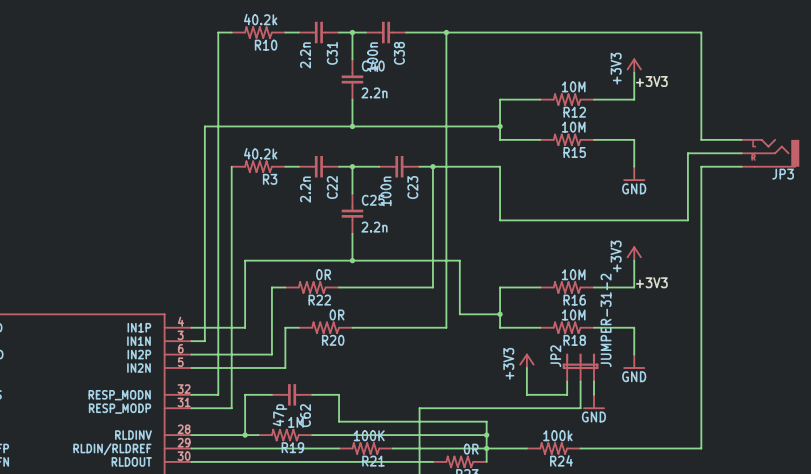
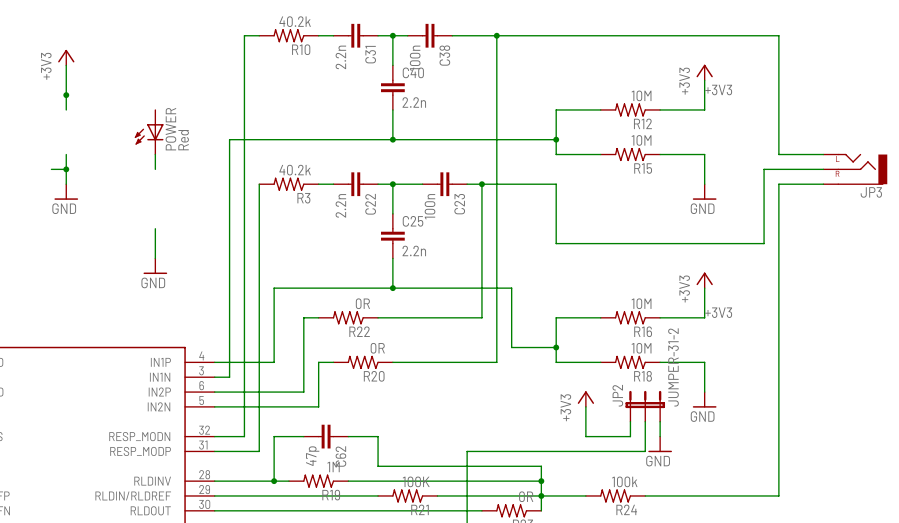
power symbol: none -> +3V3 (66, 57)
wire: none -> (66, 65) (66, 109)
junction: none -> (66, 95)
POWER: none -> Red (149, 132)
wire: none -> (66, 154) (66, 184)
wire: none -> (155, 154) (155, 169)
wire: none -> (51, 169) (66, 169)
junction: none -> (66, 169)
power symbol: none -> GND (66, 192)
wire: none -> (155, 228) (155, 258)
power symbol: none -> GND (155, 266)

